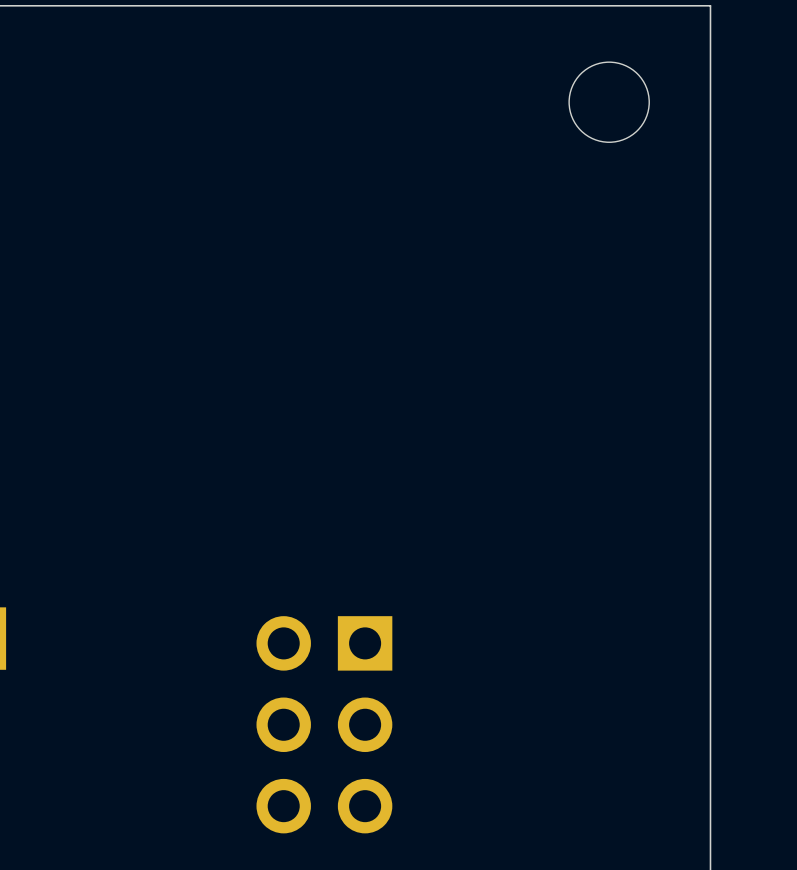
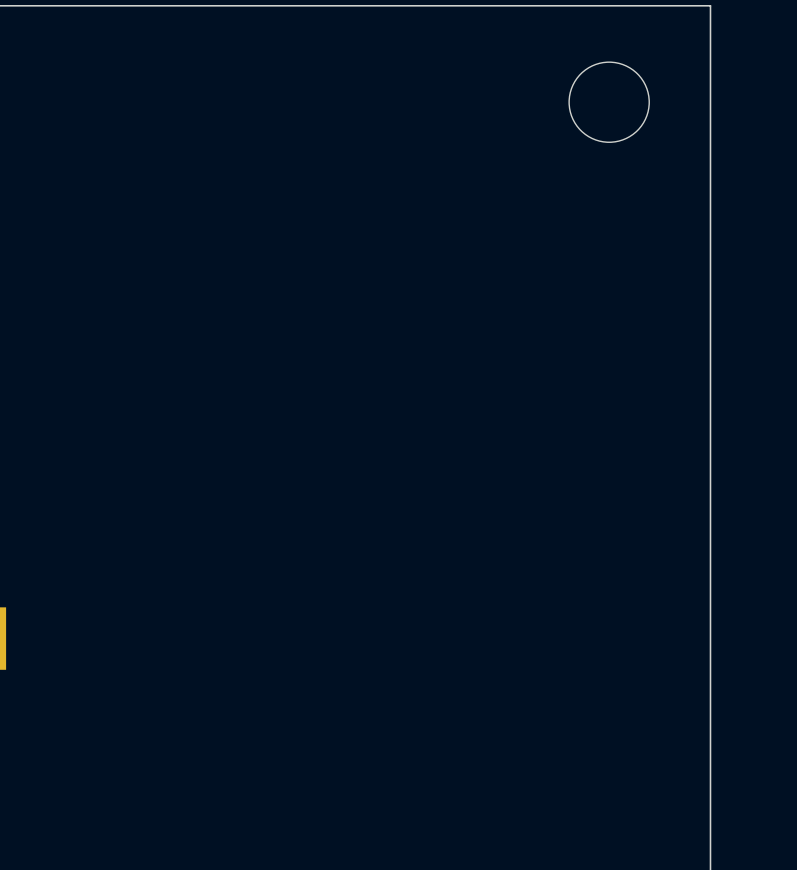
part: (324, 724) -> none

